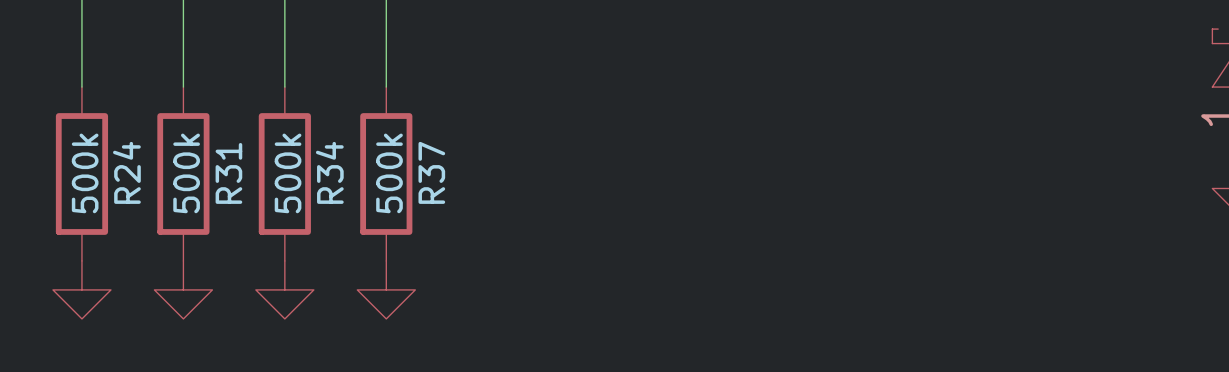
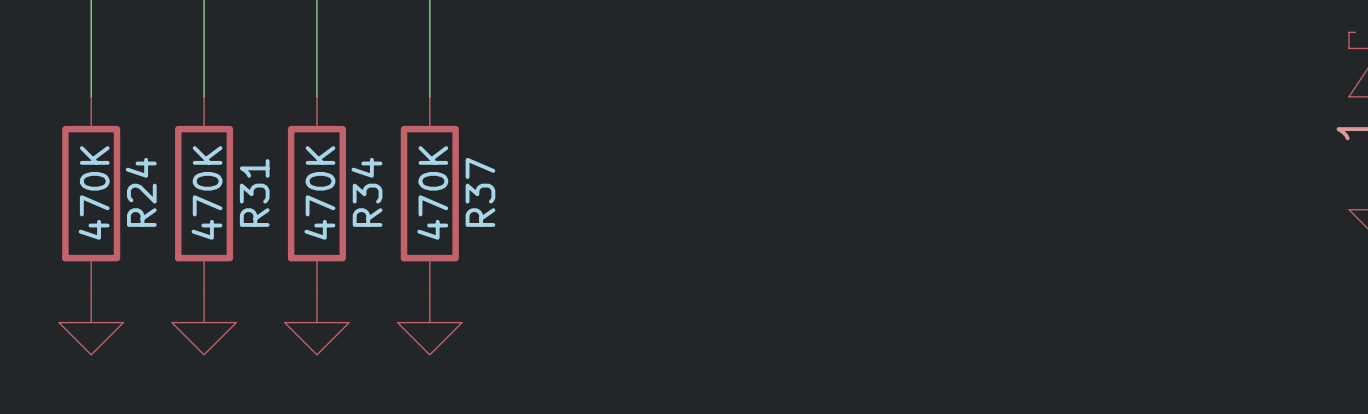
R24 value: 500k (85, 173) -> 470K (94, 192)
R31 value: 500k (186, 173) -> 470K (207, 192)
R34 value: 500k (288, 173) -> 470K (319, 192)
R37 value: 500k (389, 173) -> 470K (432, 192)

